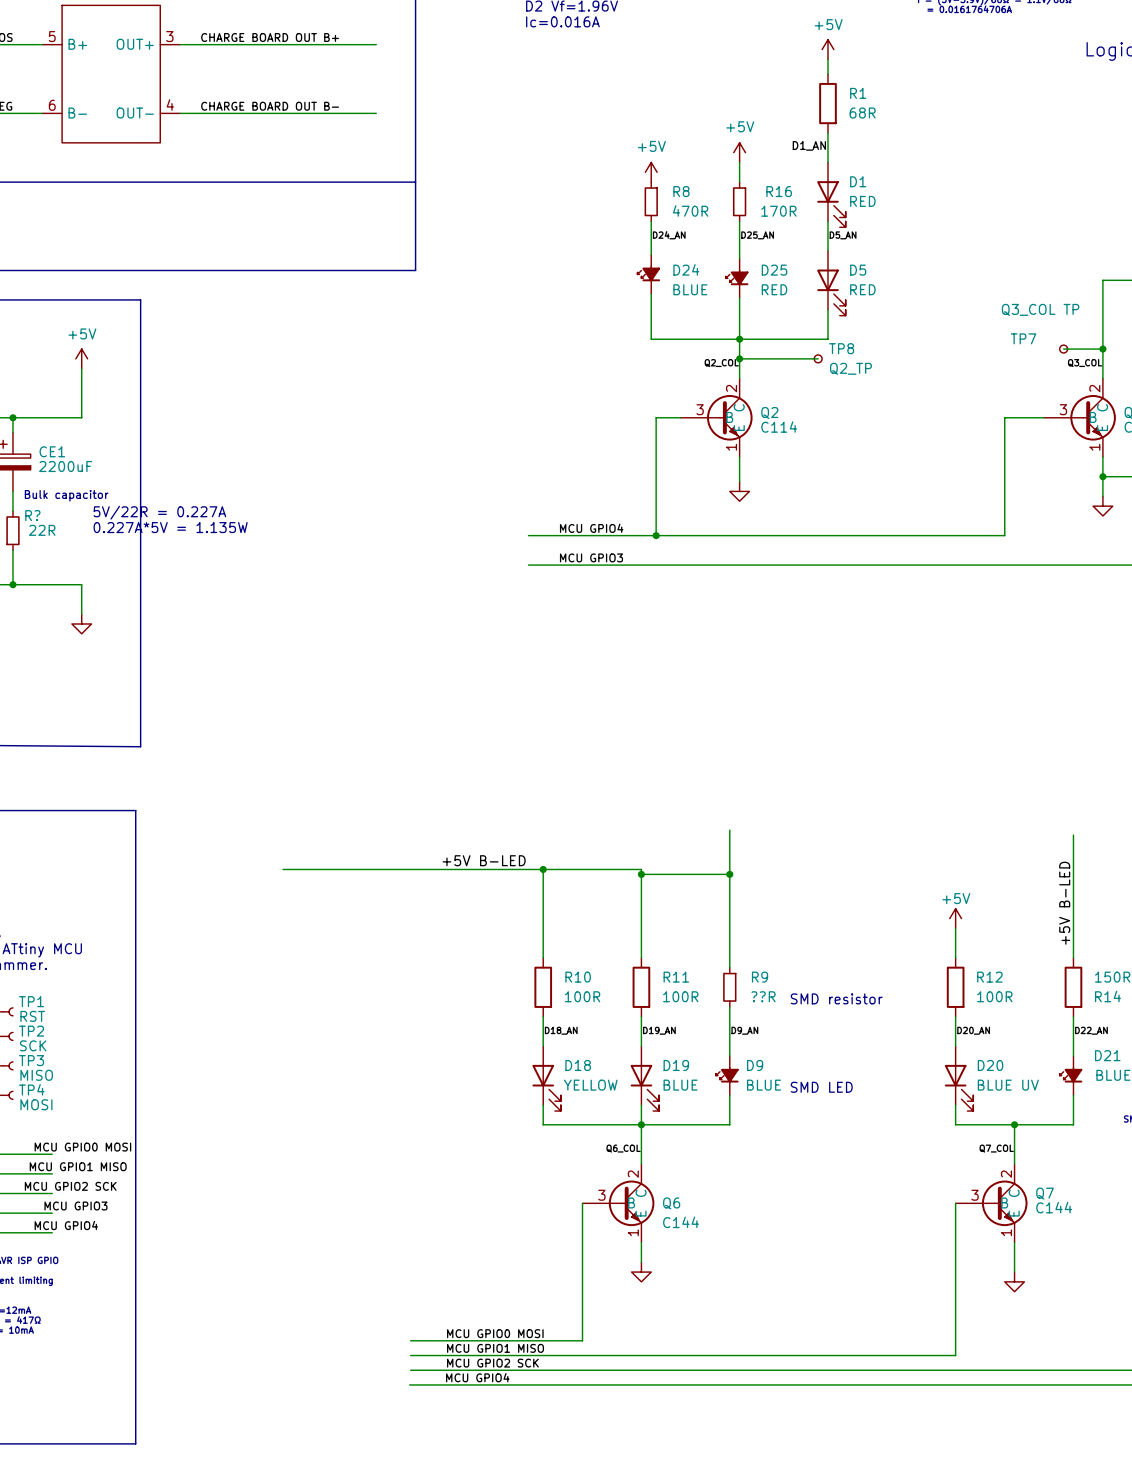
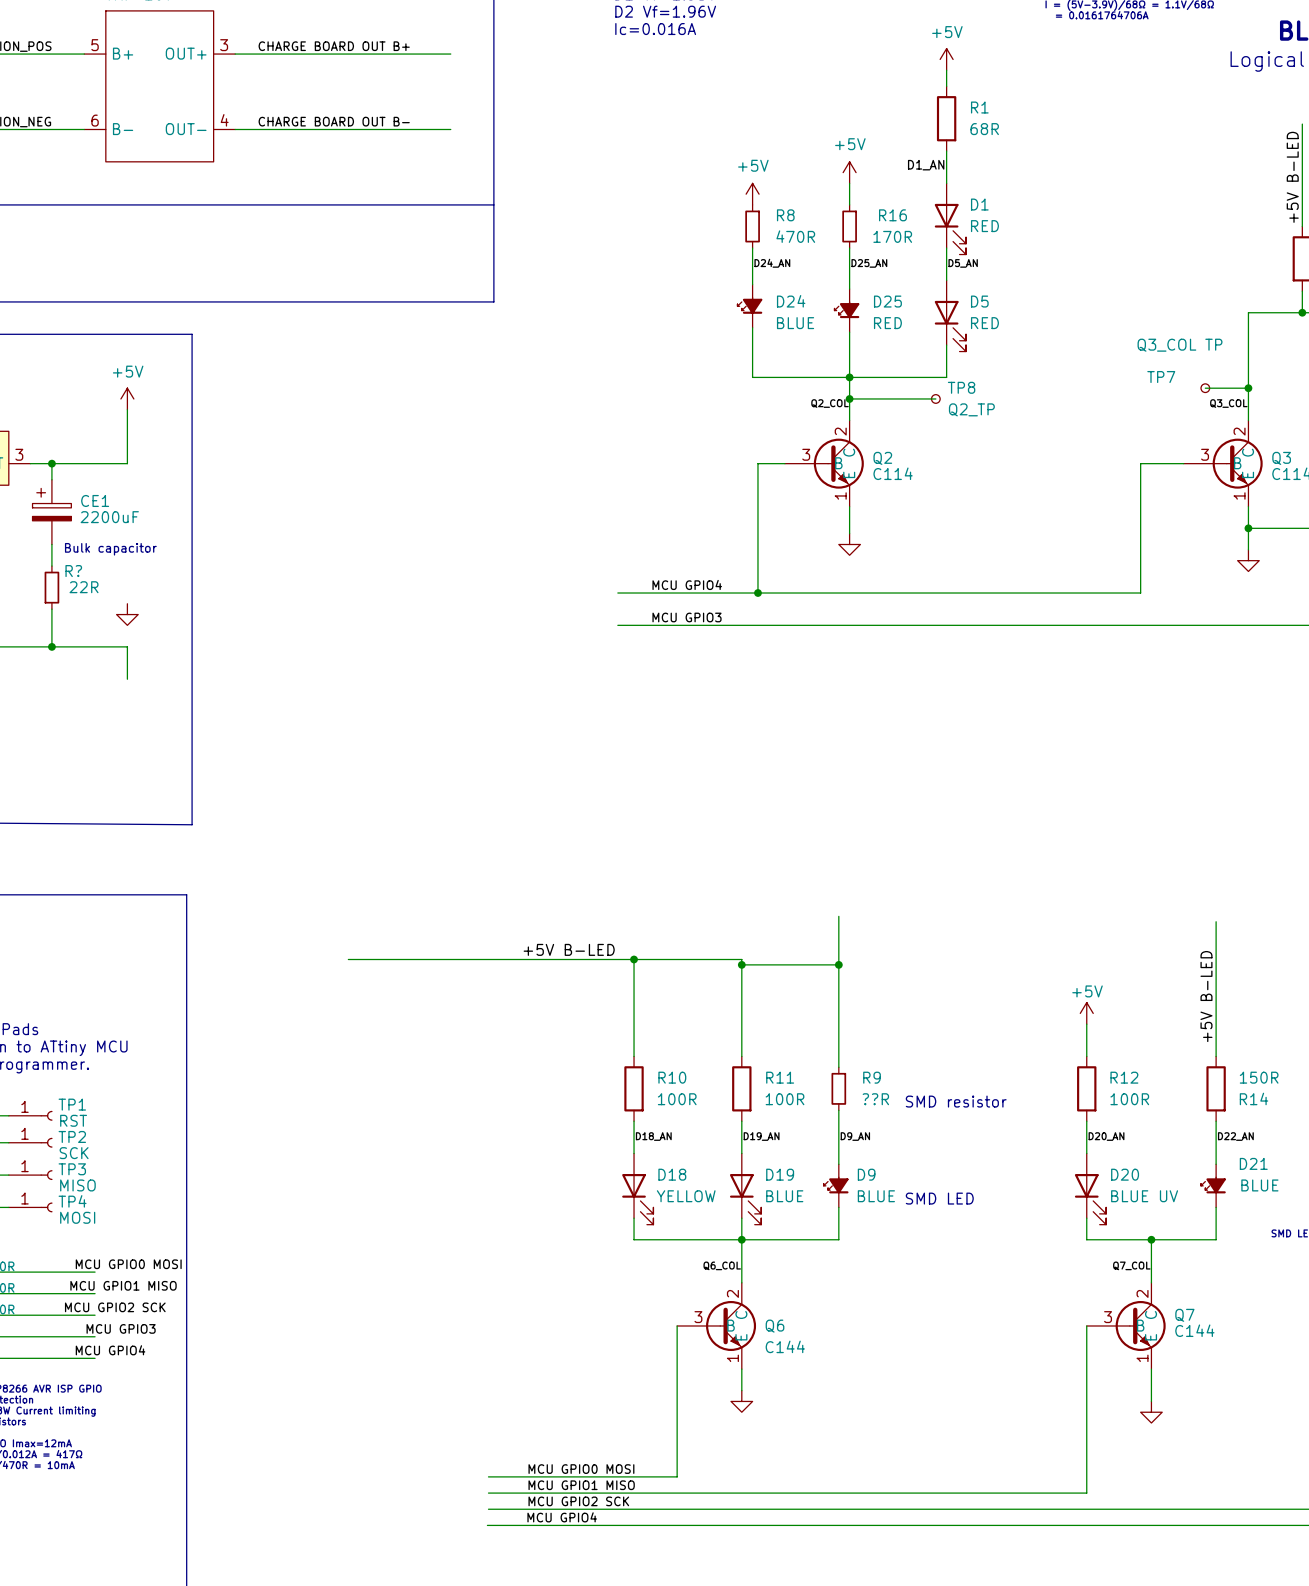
text: 5V/22R = 0.227A (159, 512) -> none
text: 0.227A*5V = 1.135W (170, 527) -> none
power symbol position: (81, 623) -> (127, 614)

